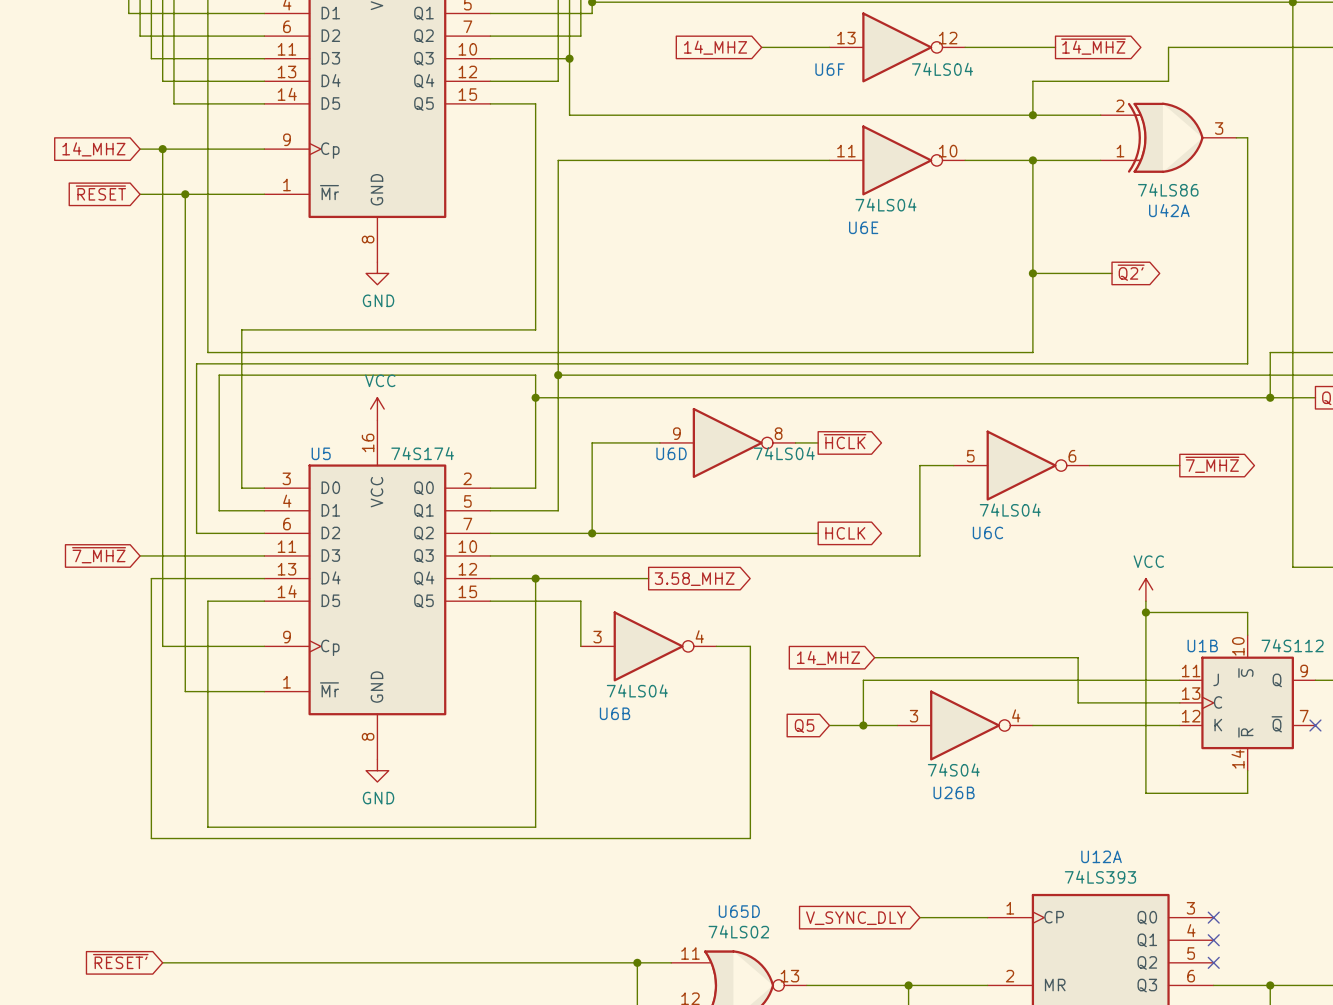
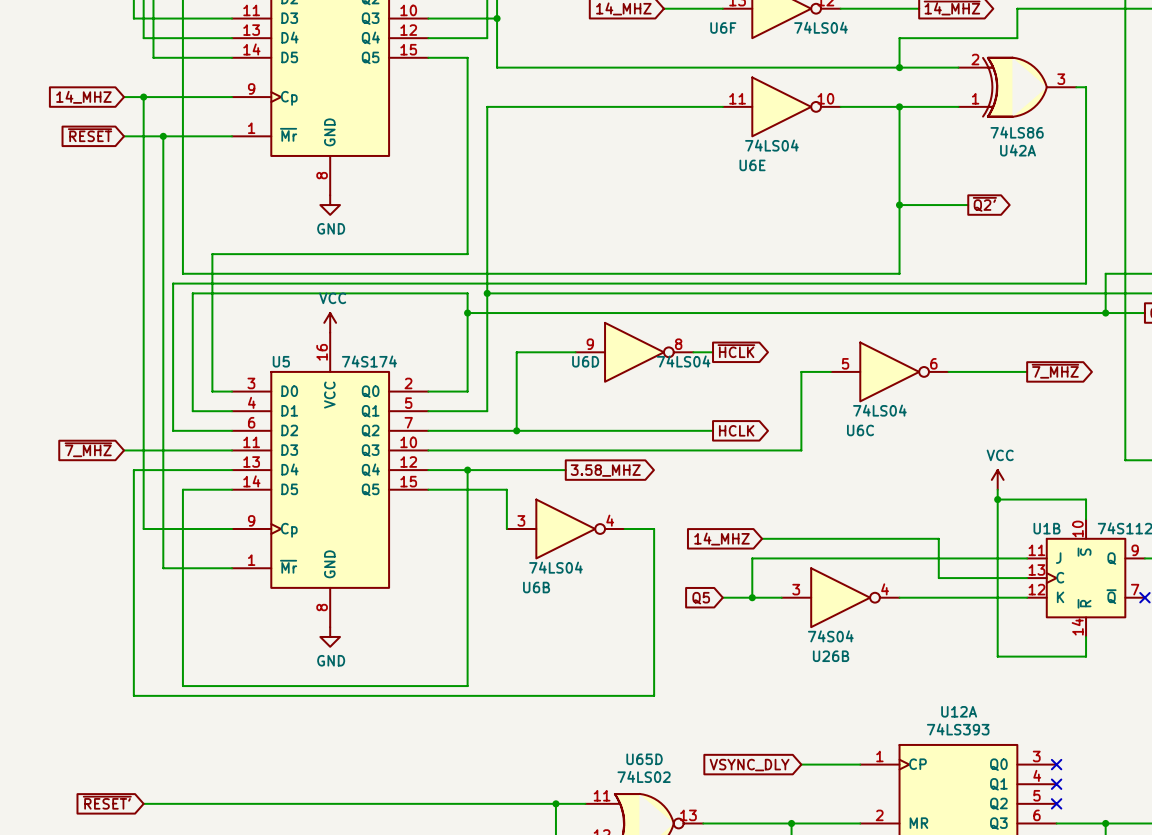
global label: V_SYNC_DLY (855, 918) -> VSYNC_DLY (749, 765)

